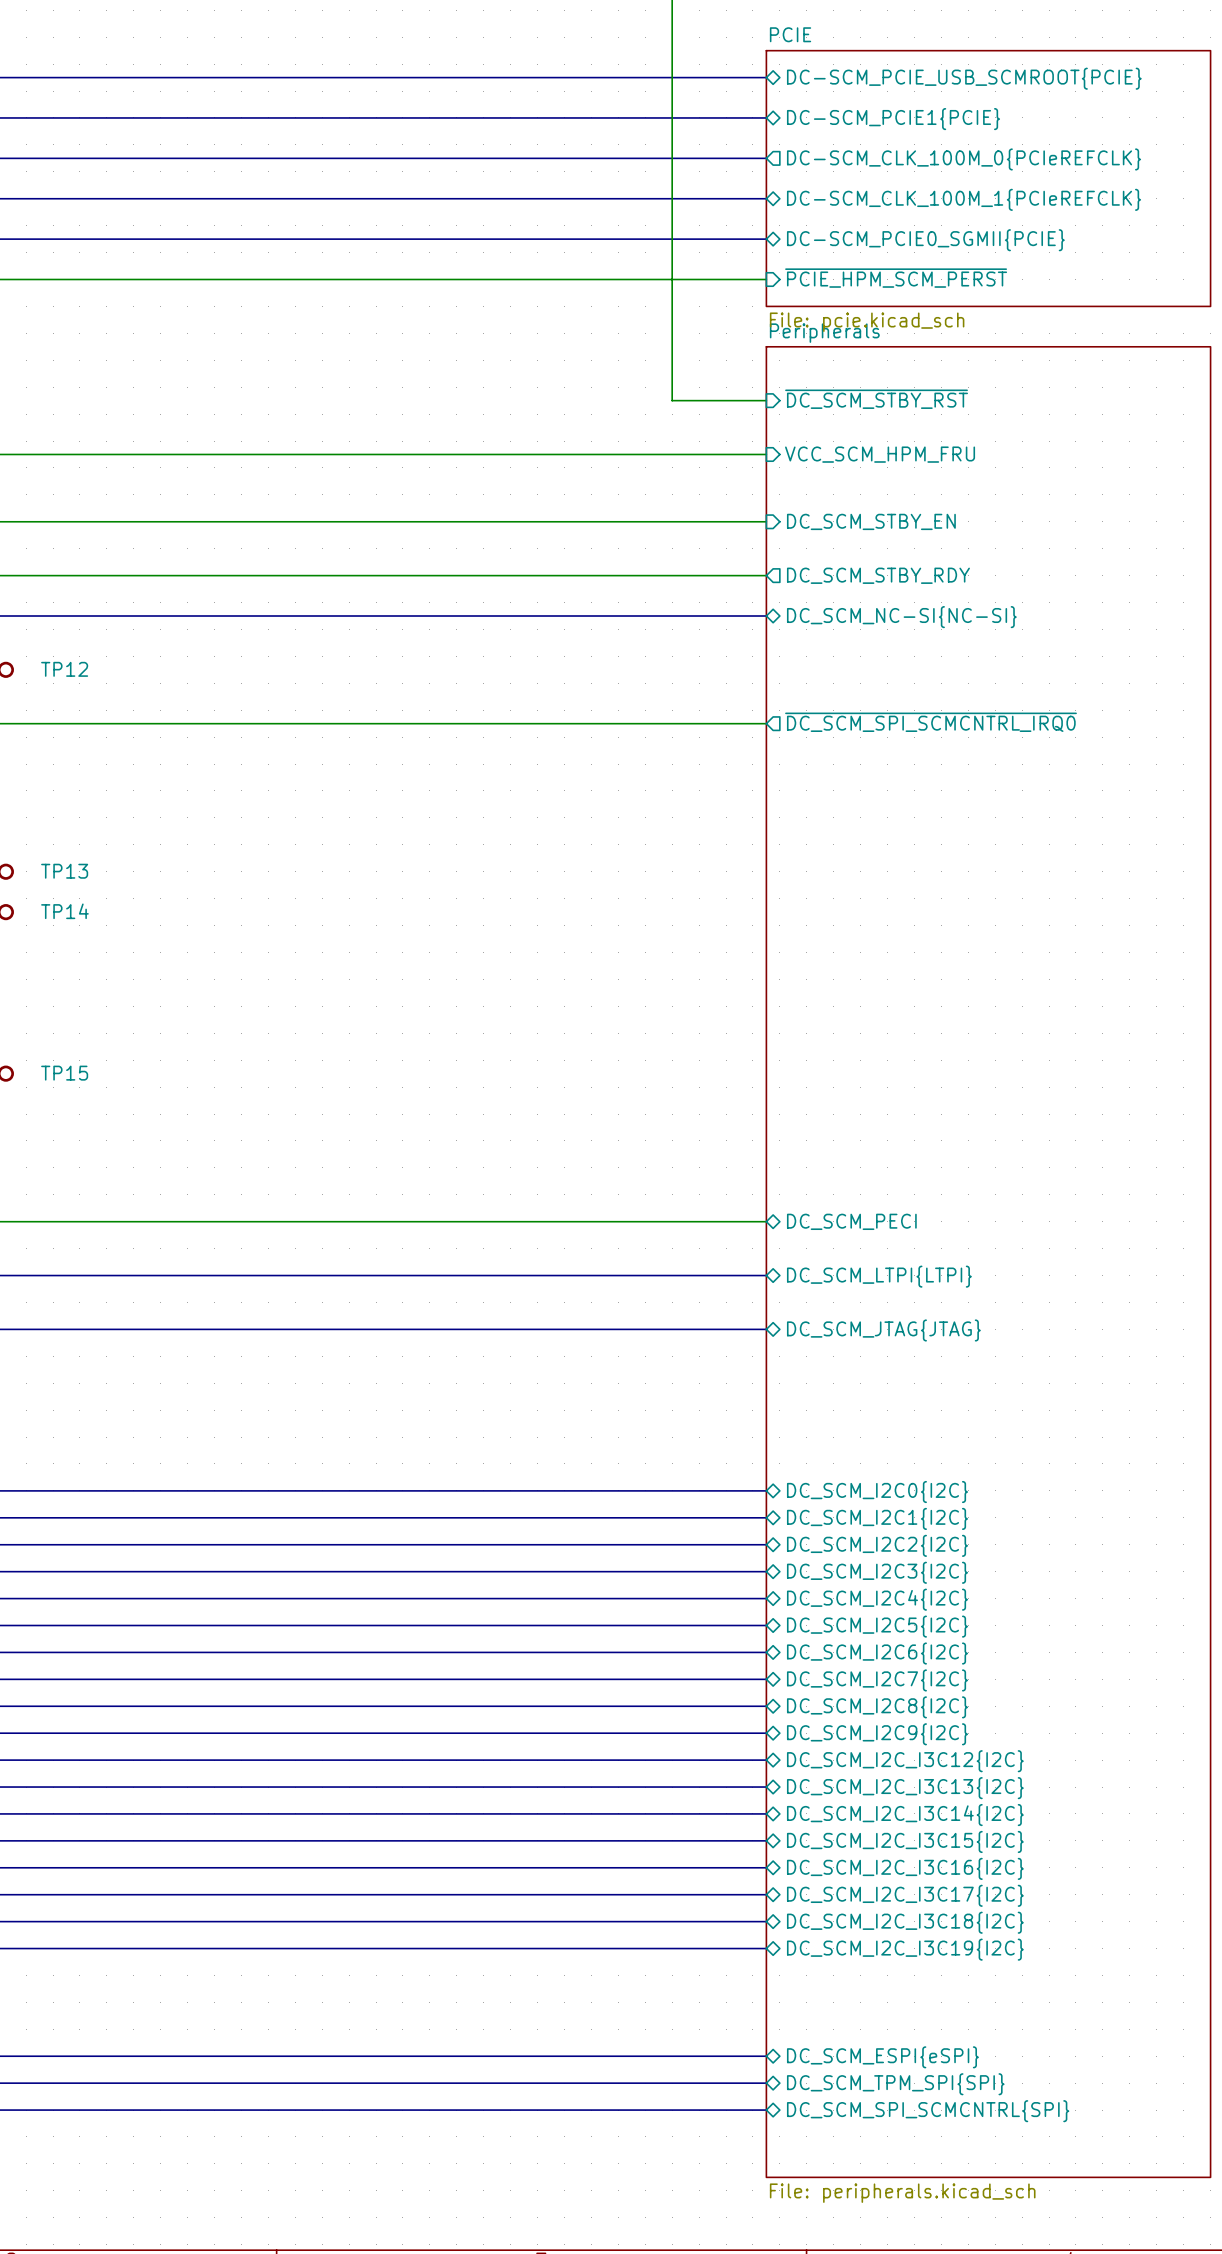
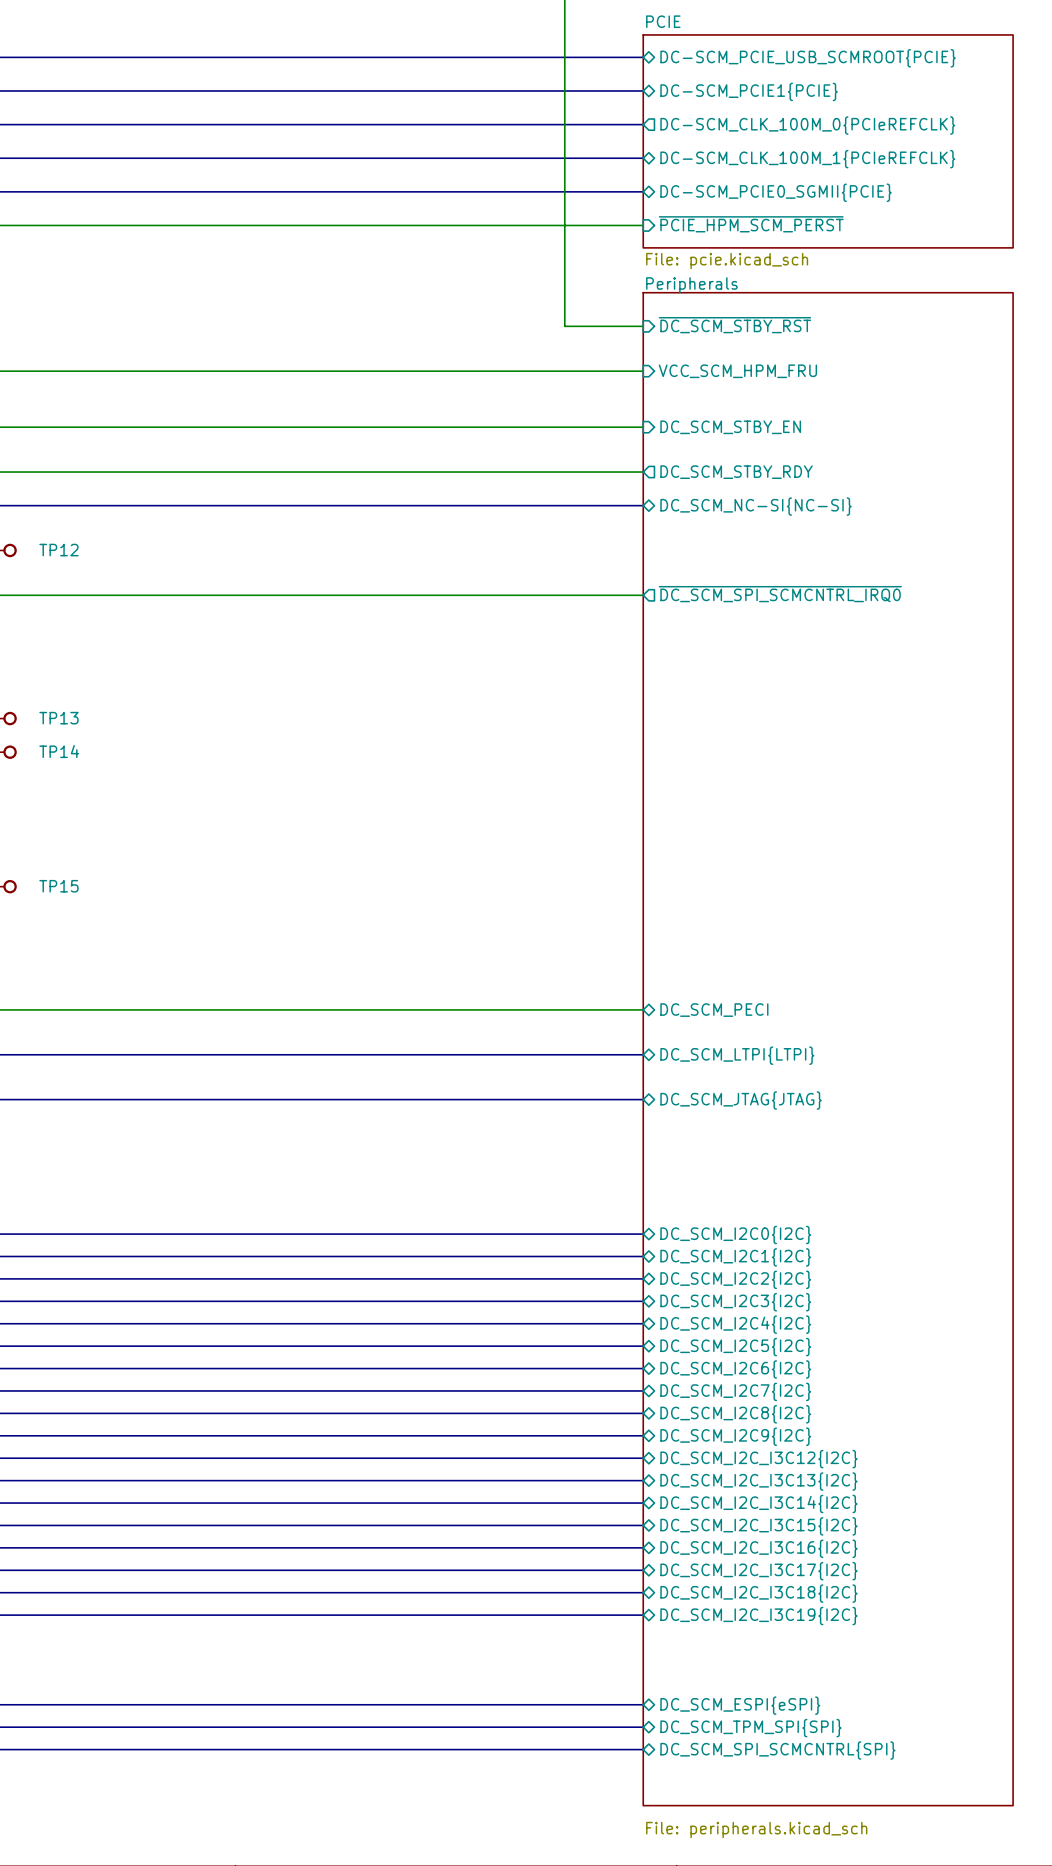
sheet Peripherals shape: [765, 345, 1212, 2179] -> [642, 292, 1014, 1807]

